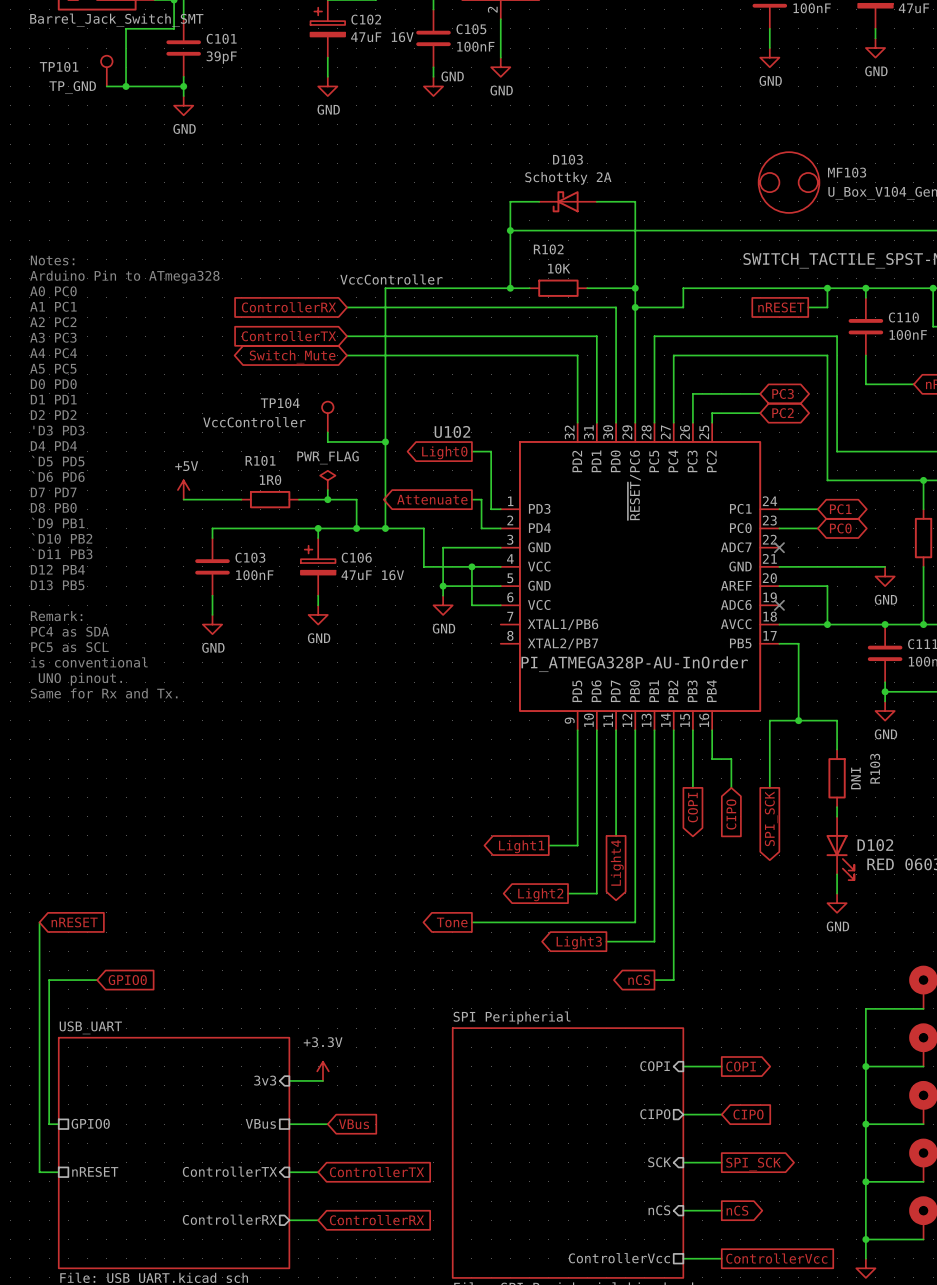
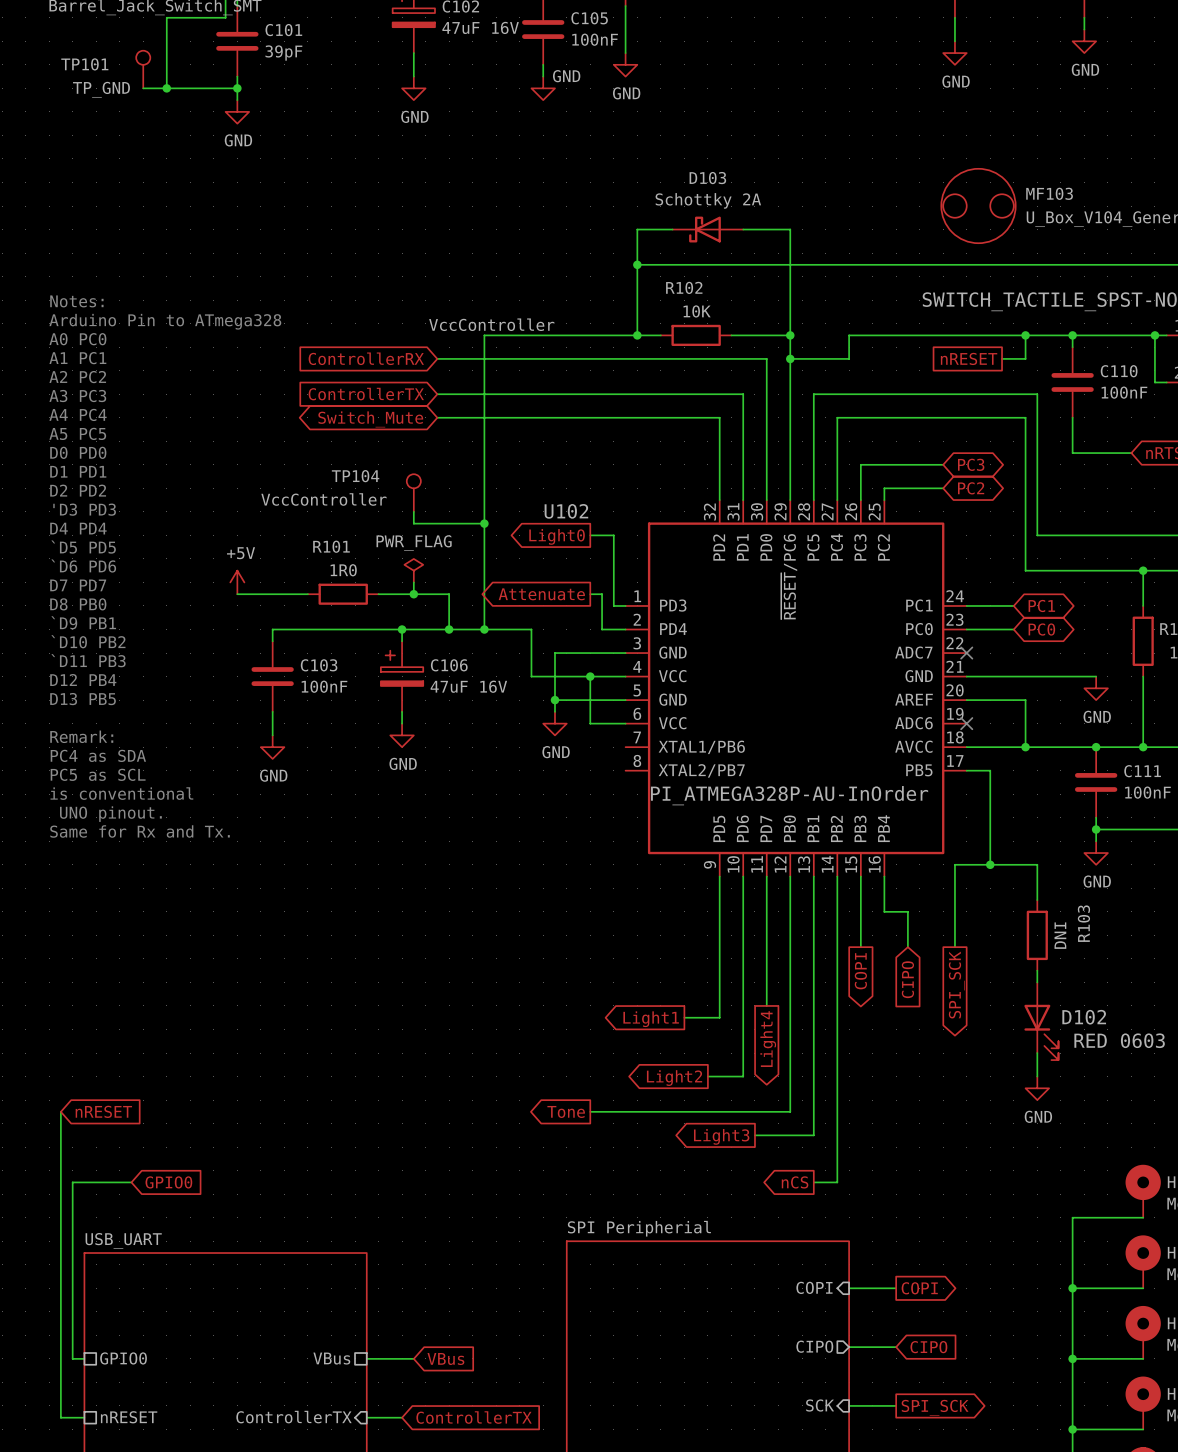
power symbol: +3.3V (323, 1071) -> none
sheet pin: 3v3 (265, 1080) -> none
wire: (289, 1080) (323, 1080) -> none

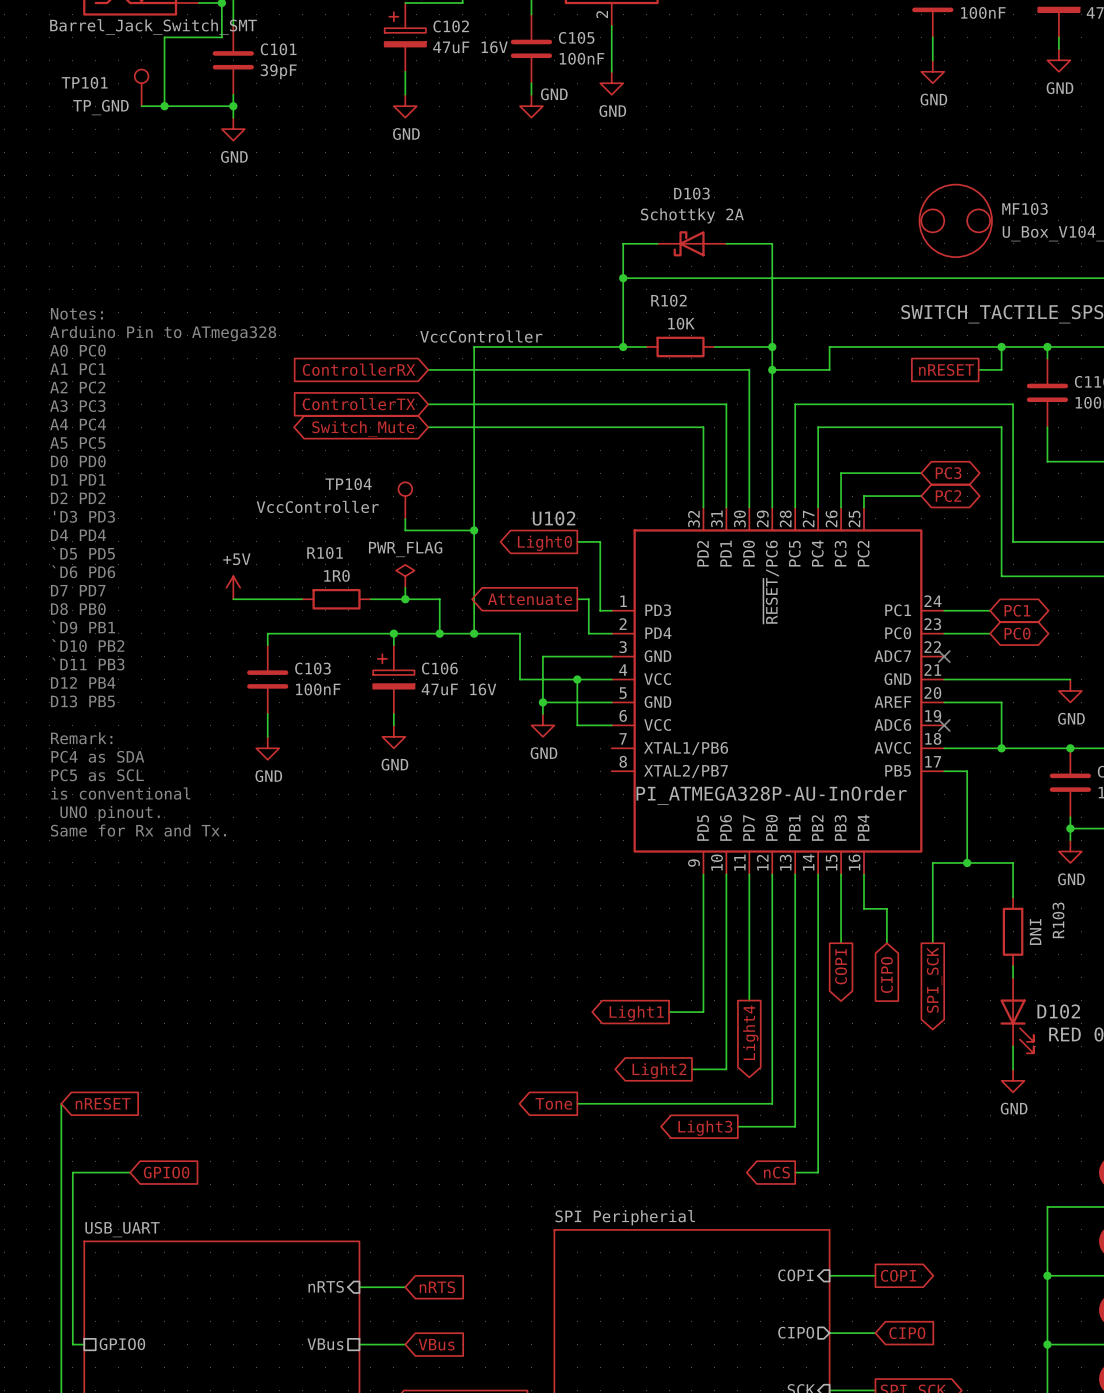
sheet pin: none -> nRTS (326, 1286)
wire: none -> (359, 1287) (405, 1287)
global label: none -> nRTS (437, 1287)

